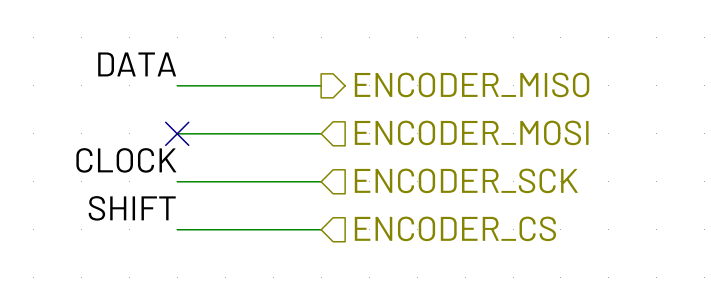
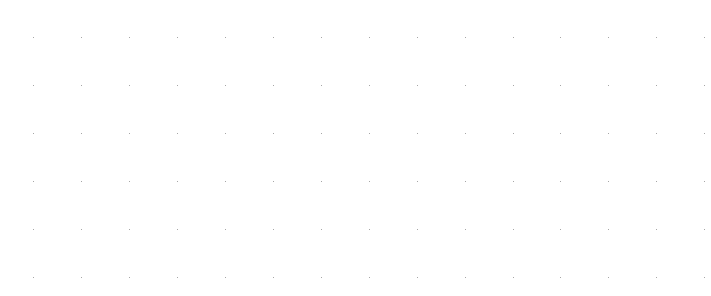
label: DATA (137, 64) -> none
hierarchical label: ENCODER_MISO (472, 84) -> none
wire: (177, 85) (321, 85) -> none
hierarchical label: ENCODER_MOSI (471, 132) -> none
wire: (177, 133) (321, 133) -> none
no-connect mark: (177, 133) -> none
label: CLOCK (126, 160) -> none
hierarchical label: ENCODER_SCK (466, 180) -> none
wire: (177, 181) (321, 181) -> none
label: SHIFT (132, 208) -> none
hierarchical label: ENCODER_CS (455, 228) -> none
wire: (177, 229) (321, 229) -> none

